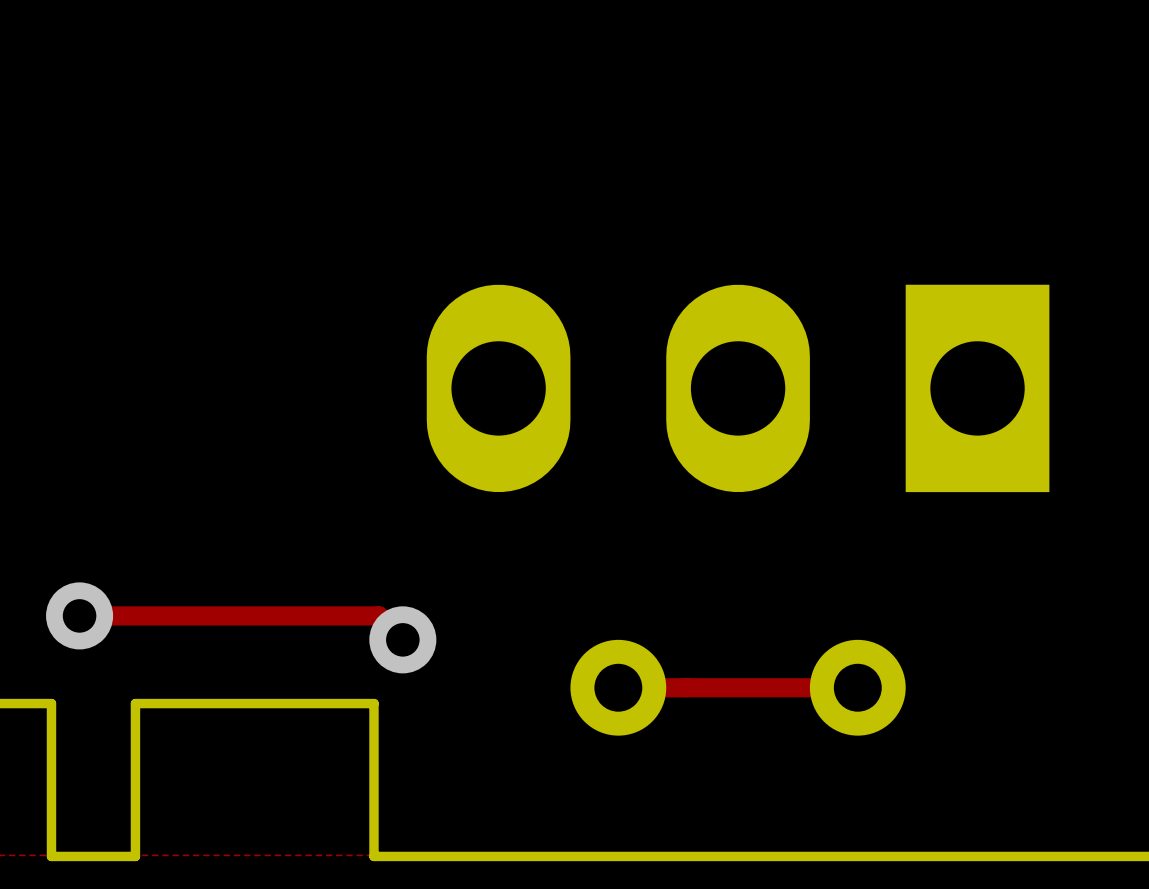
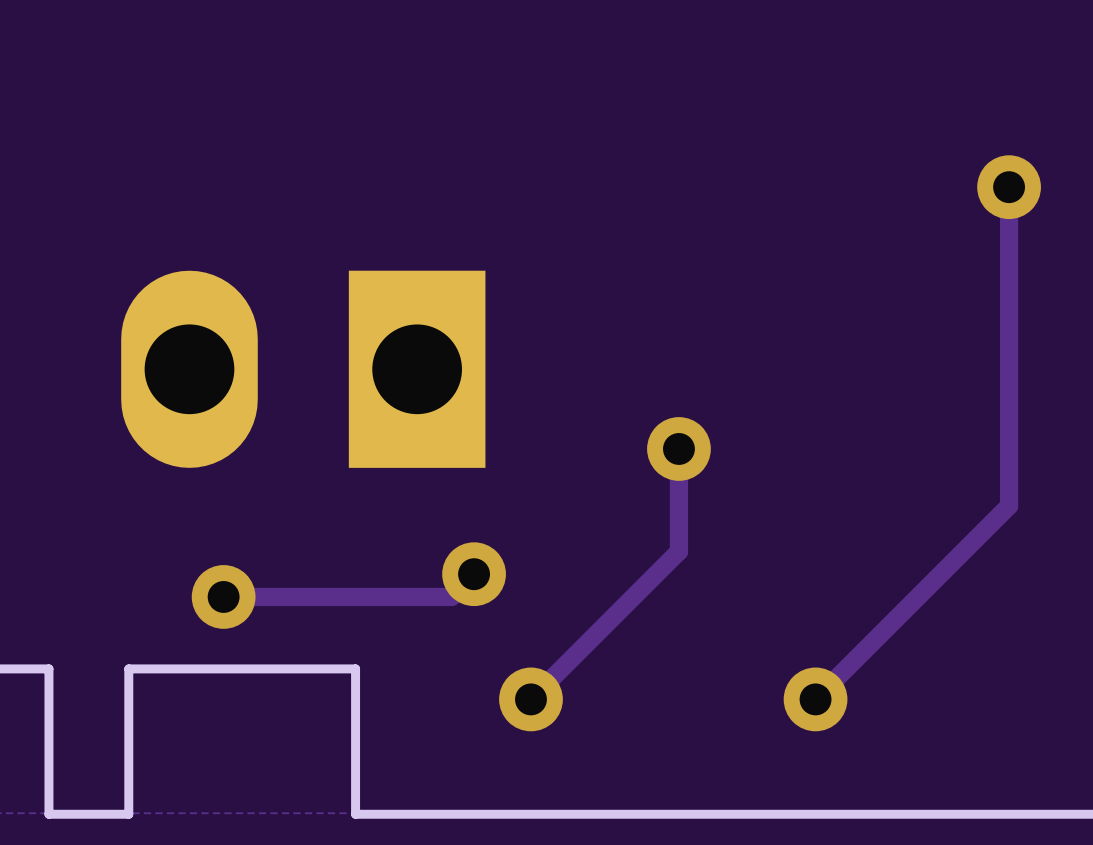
track: none -> (1009, 187) (1009, 505) (815, 699)
via: none -> (1009, 187)
part: none -> (303, 369)
part: (738, 388) -> none
track: none -> (678, 448) (678, 551) (530, 699)
via: none -> (678, 448)
track: none -> (474, 574) (451, 596) (223, 596)
via: none -> (474, 574)
track: (79, 615) (378, 615) (402, 639) -> none
via: (79, 615) -> none
via: none -> (223, 596)
via: (402, 639) -> none
track: (618, 687) (857, 687) -> none
part: (738, 687) -> none
via: none -> (530, 699)
via: none -> (815, 699)

